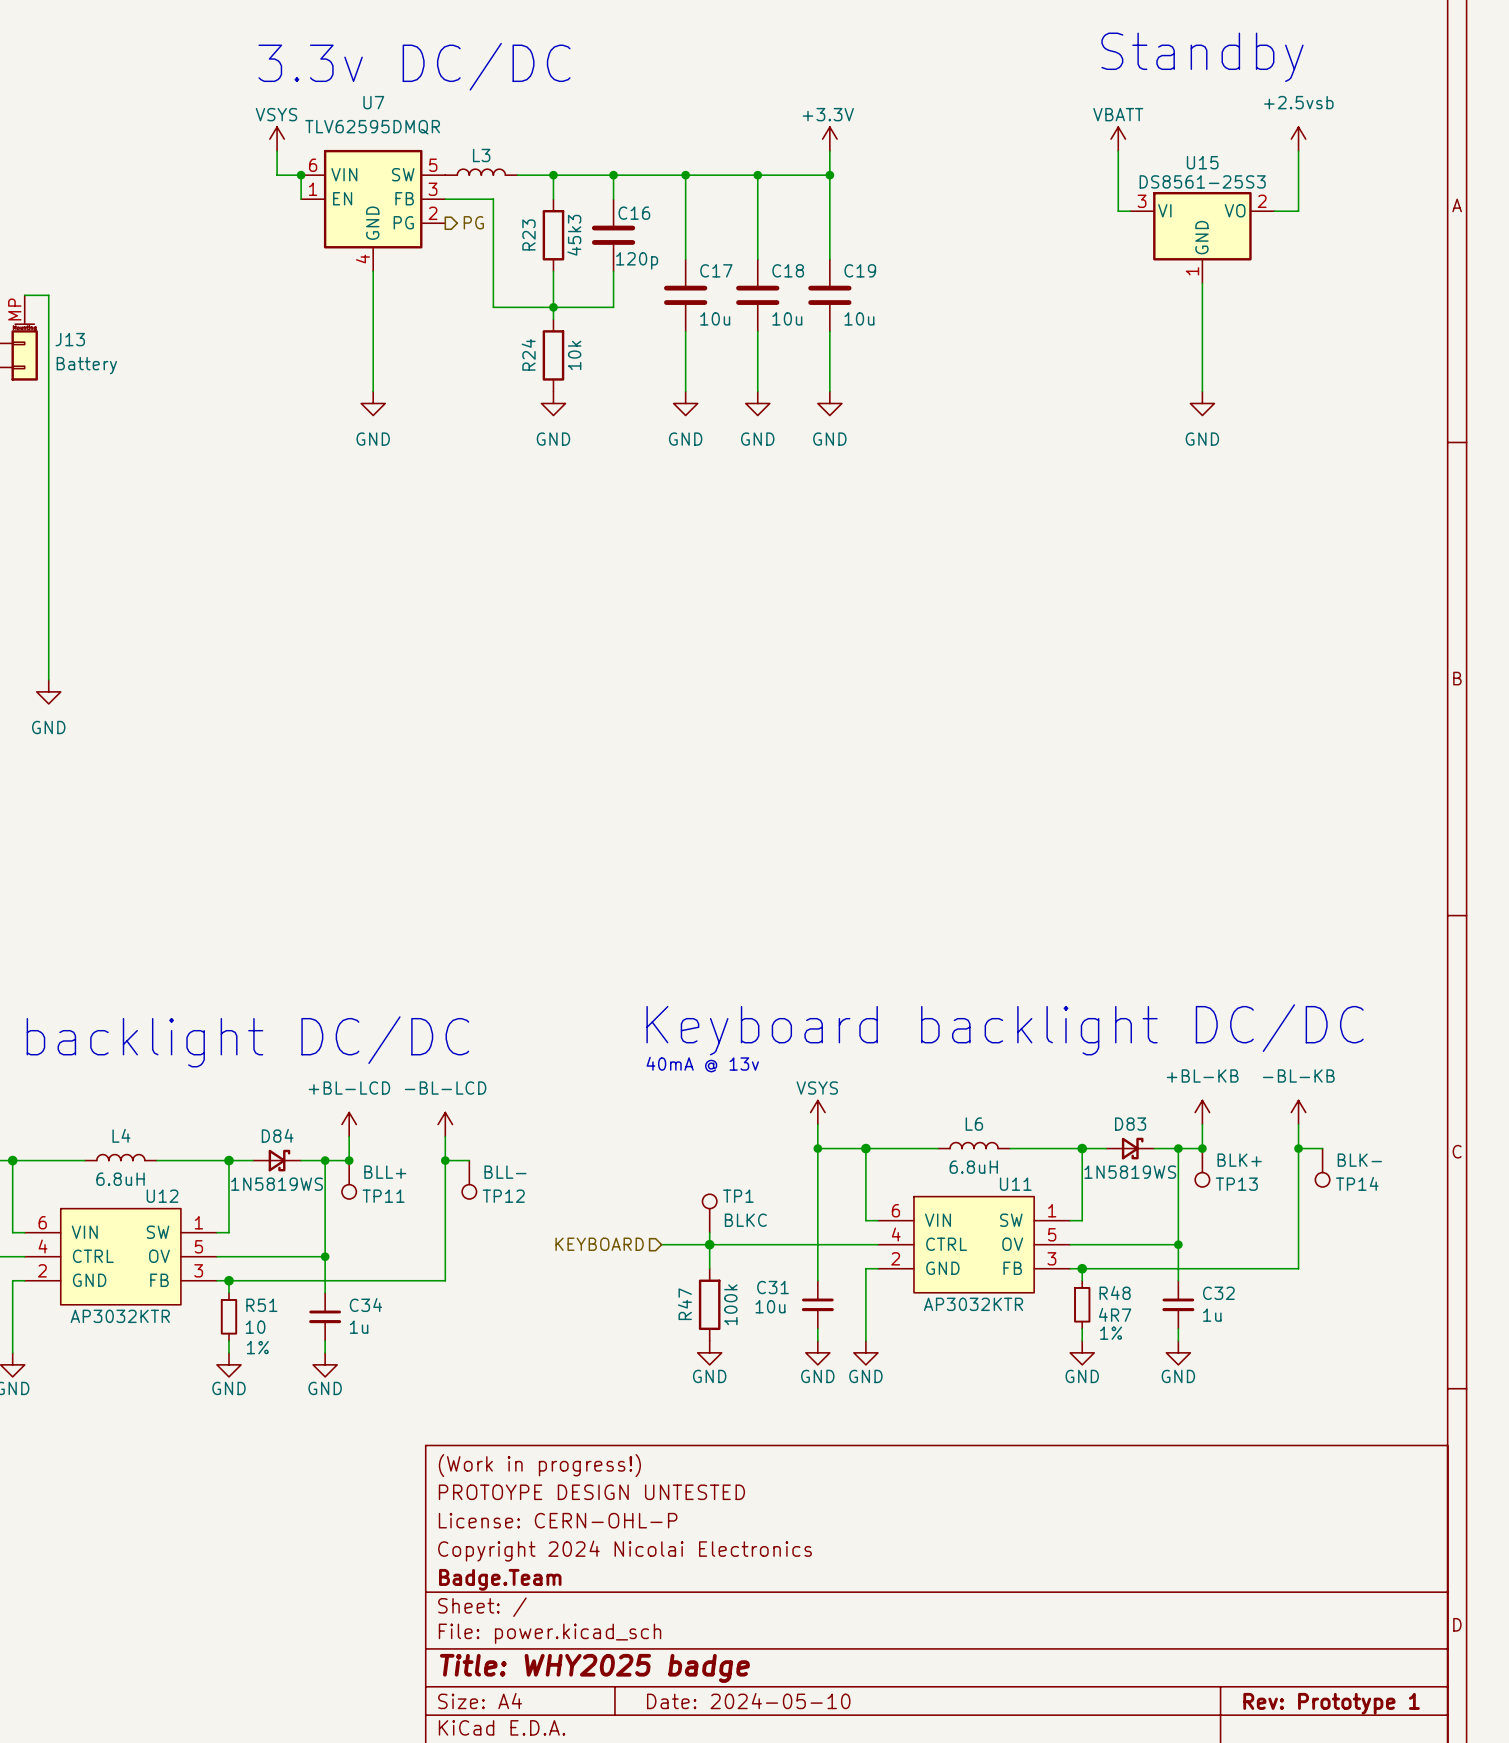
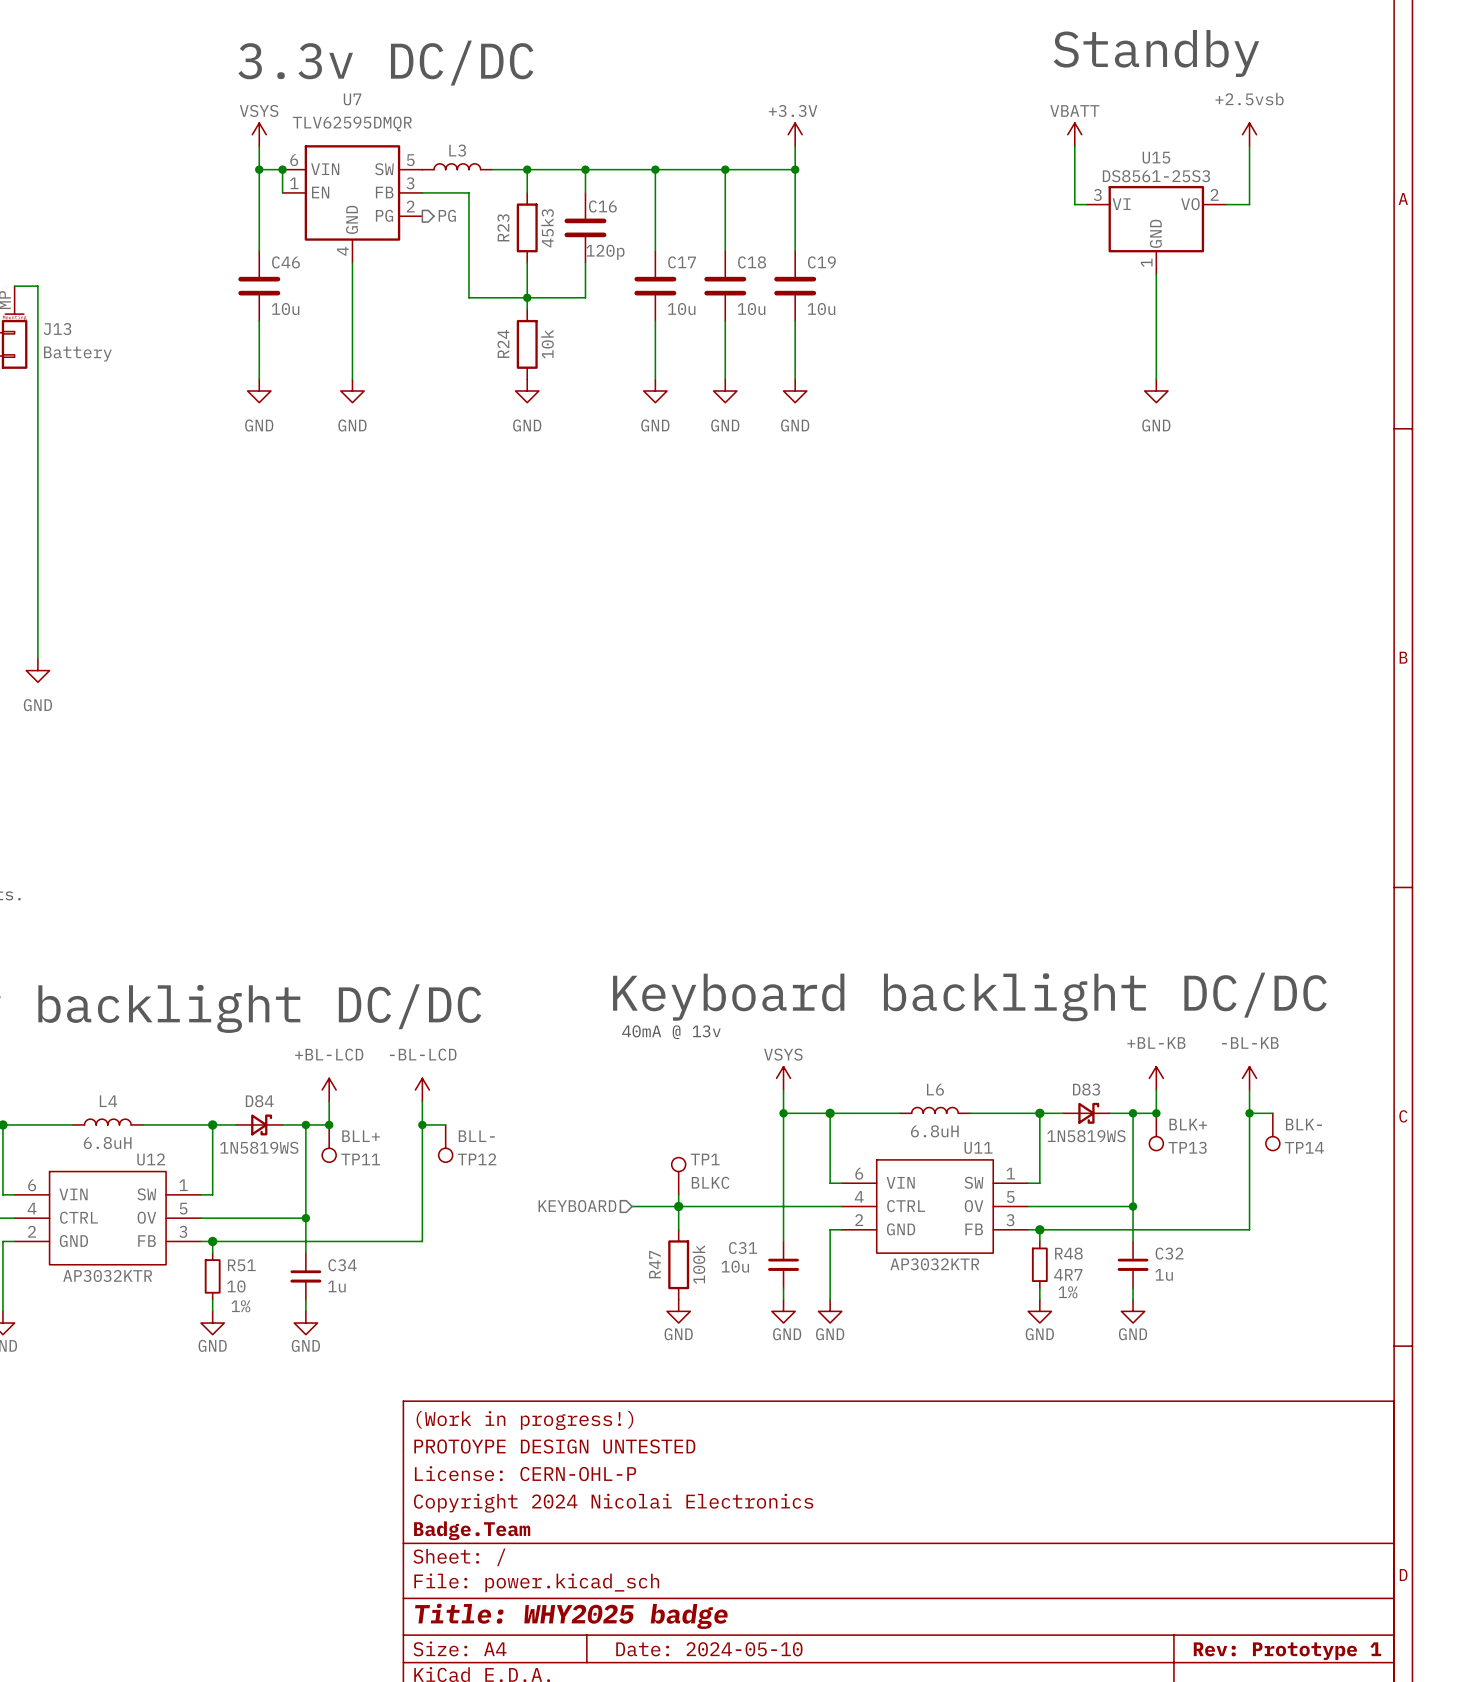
wire: none -> (259, 169) (259, 251)
junction: none -> (259, 169)
C46: none -> 10u (259, 286)
wire: none -> (259, 321) (259, 379)
power symbol: none -> GND (259, 391)

